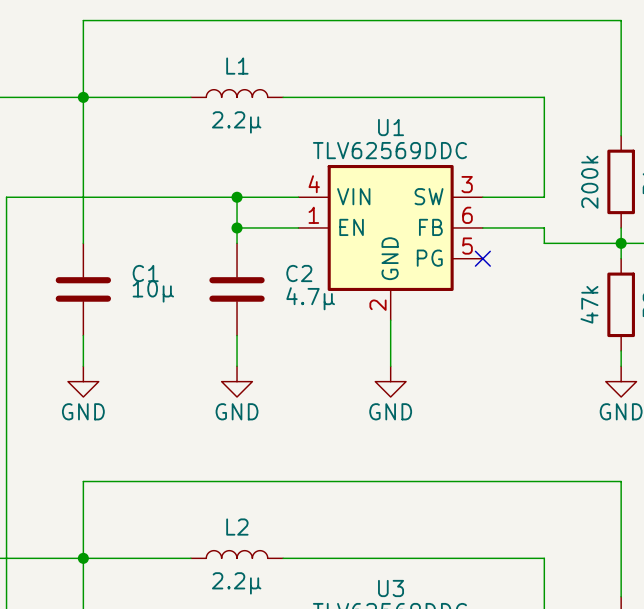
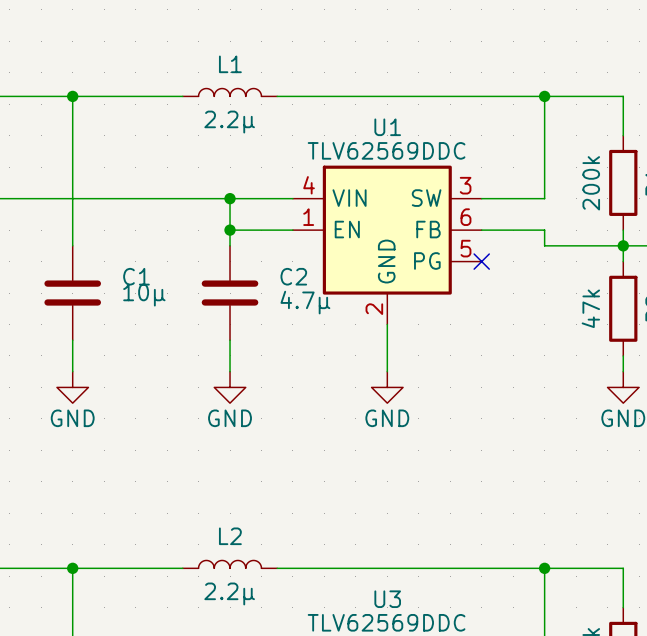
wire: (83, 97) (83, 20) (621, 20) (621, 97) -> (544, 96) (623, 96)
junction: none -> (544, 96)
wire: (83, 558) (83, 481) (621, 481) (621, 558) -> (544, 568) (623, 568)
junction: none -> (544, 568)

